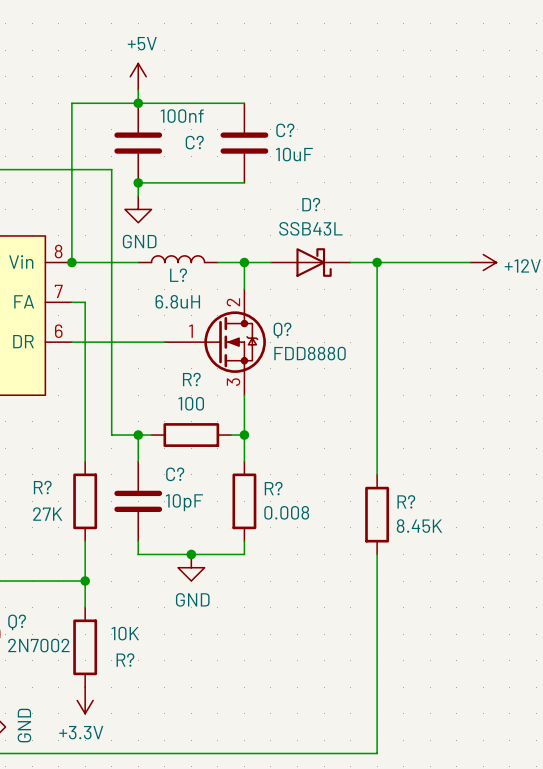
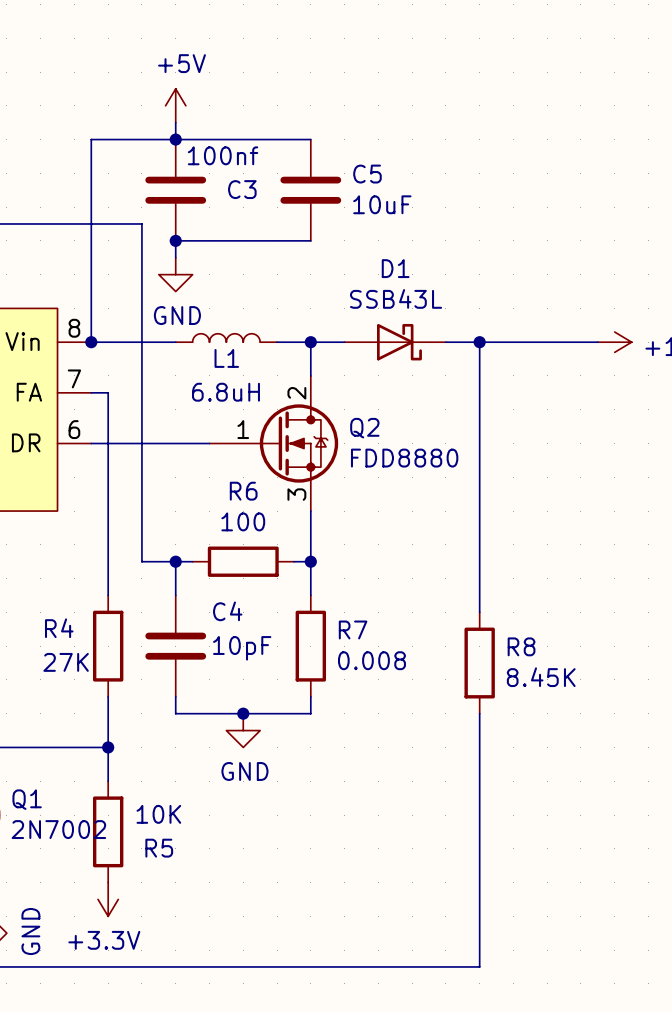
C? name: C? (285, 130) -> C5 (367, 174)
C? name: C? (194, 142) -> C3 (242, 189)
D? name: D? (311, 204) -> D1 (395, 268)
L? name: L? (178, 275) -> L1 (226, 358)
Q? name: Q? (282, 330) -> Q2 (364, 428)
R? name: R? (191, 379) -> R6 (243, 491)
C? name: C? (175, 474) -> C4 (227, 611)
R? name: R? (42, 487) -> R4 (59, 628)
R? name: R? (273, 488) -> R7 (353, 629)
R? name: R? (406, 501) -> R8 (521, 646)
Q? name: Q? (17, 622) -> Q1 (27, 799)
R? name: R? (125, 660) -> R5 (159, 848)

